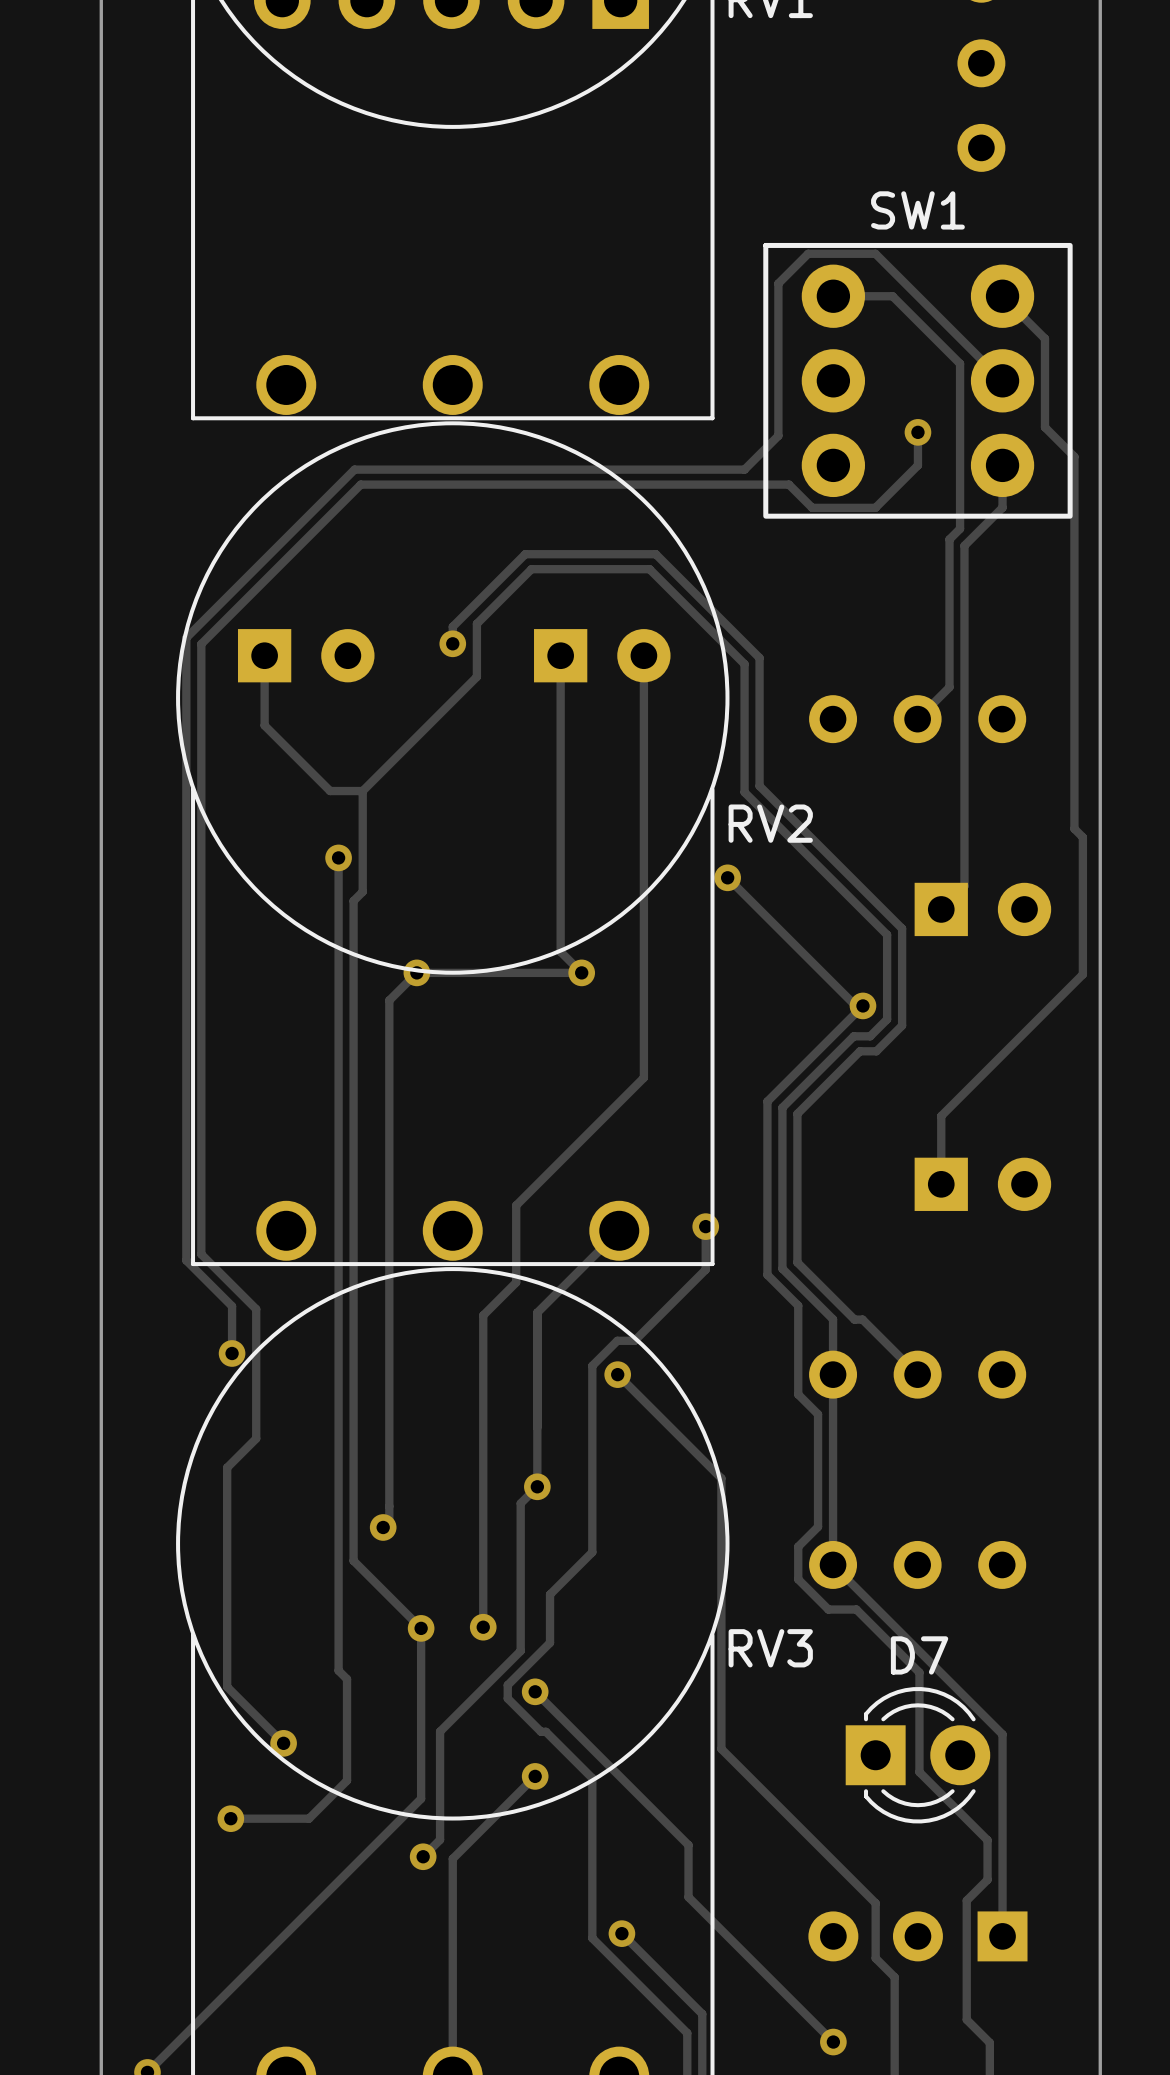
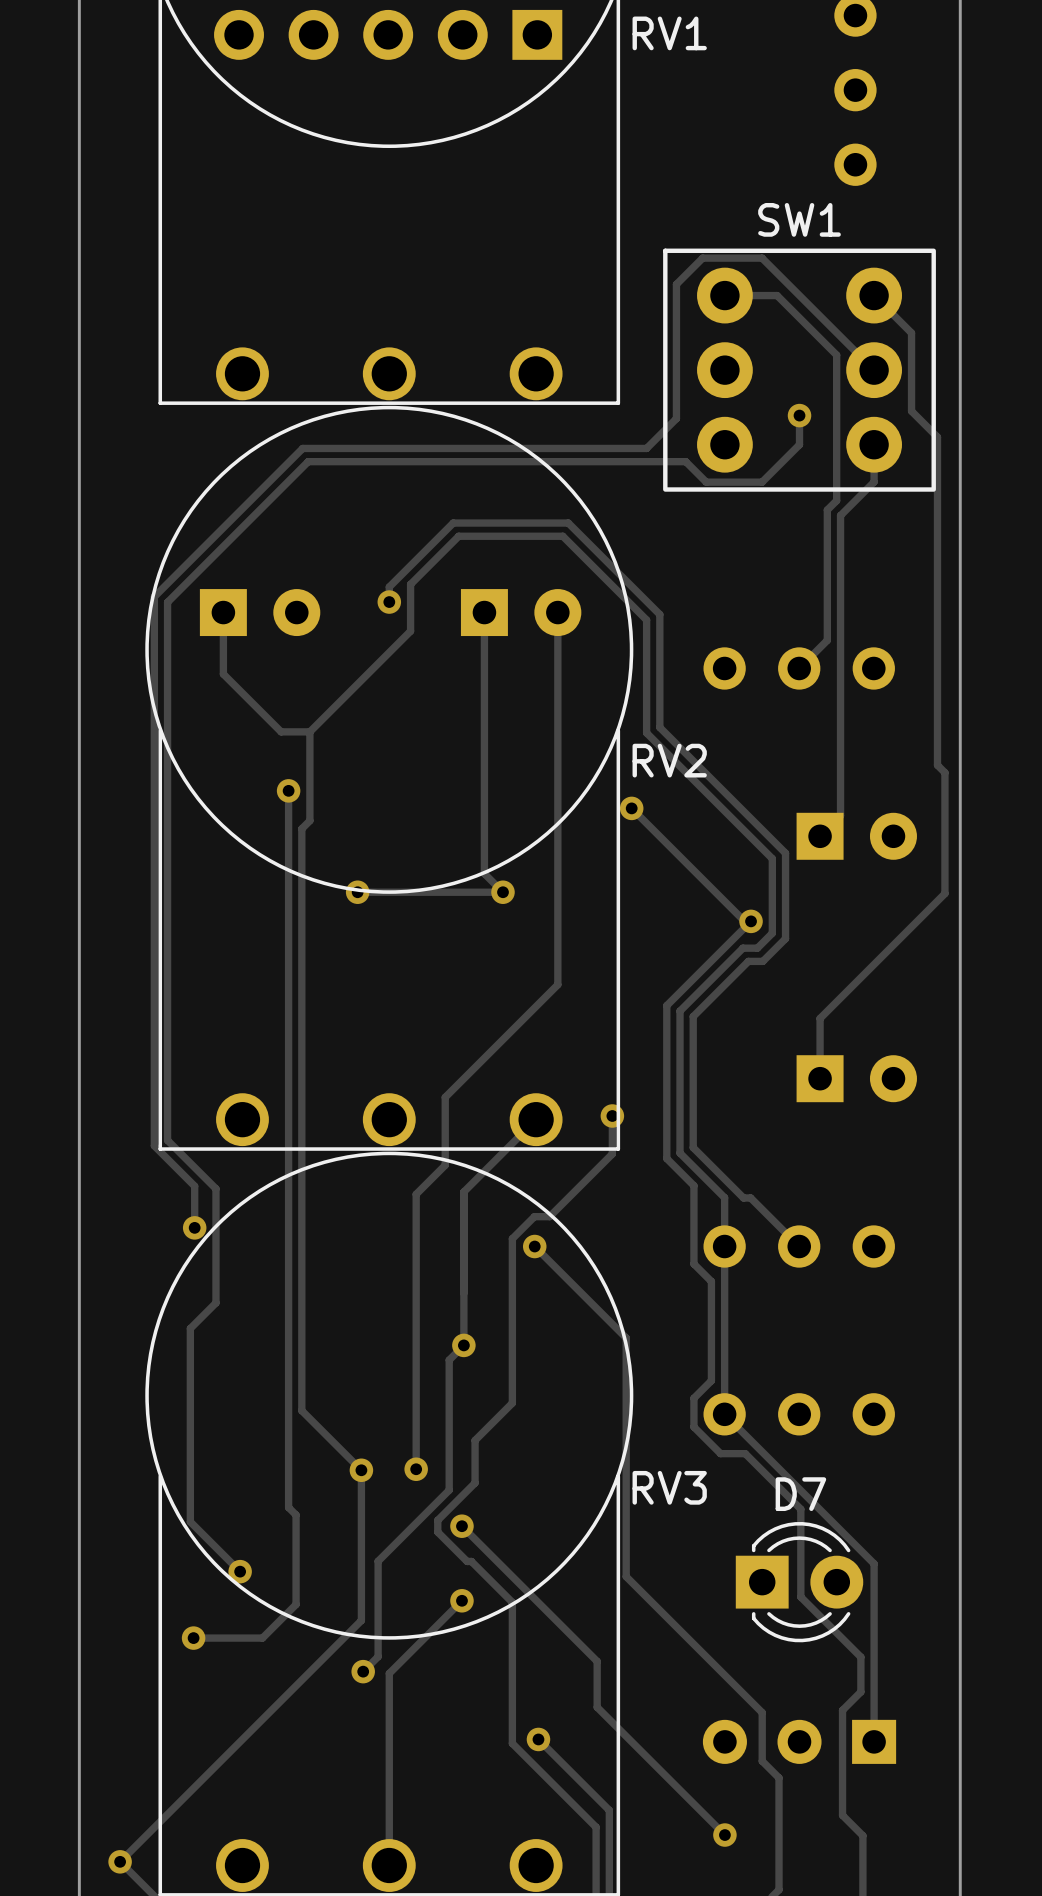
track: (416, 972) (389, 1000) (389, 1521) (383, 1527) -> none
via: (383, 1527) -> none

